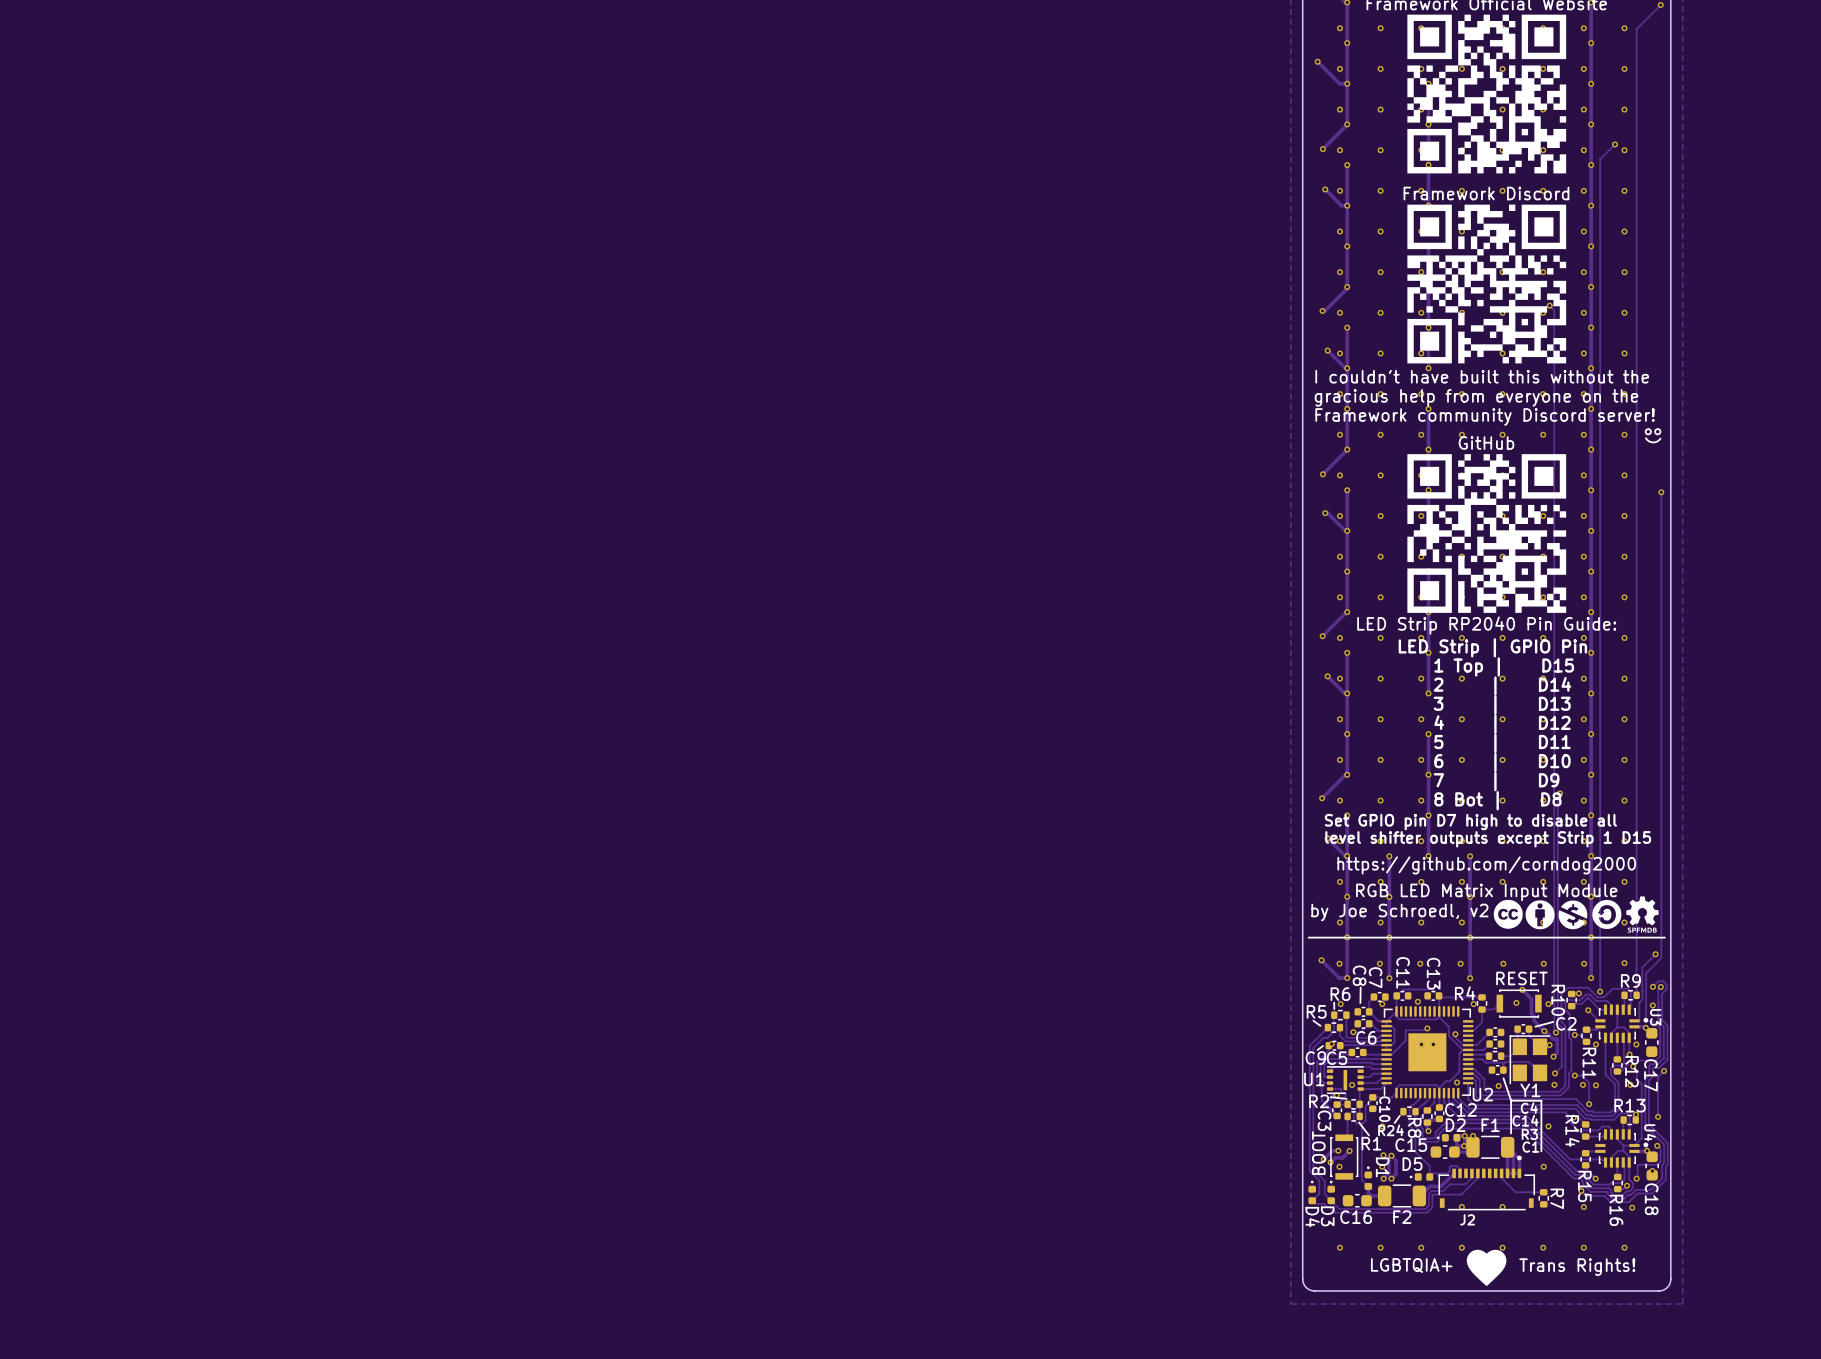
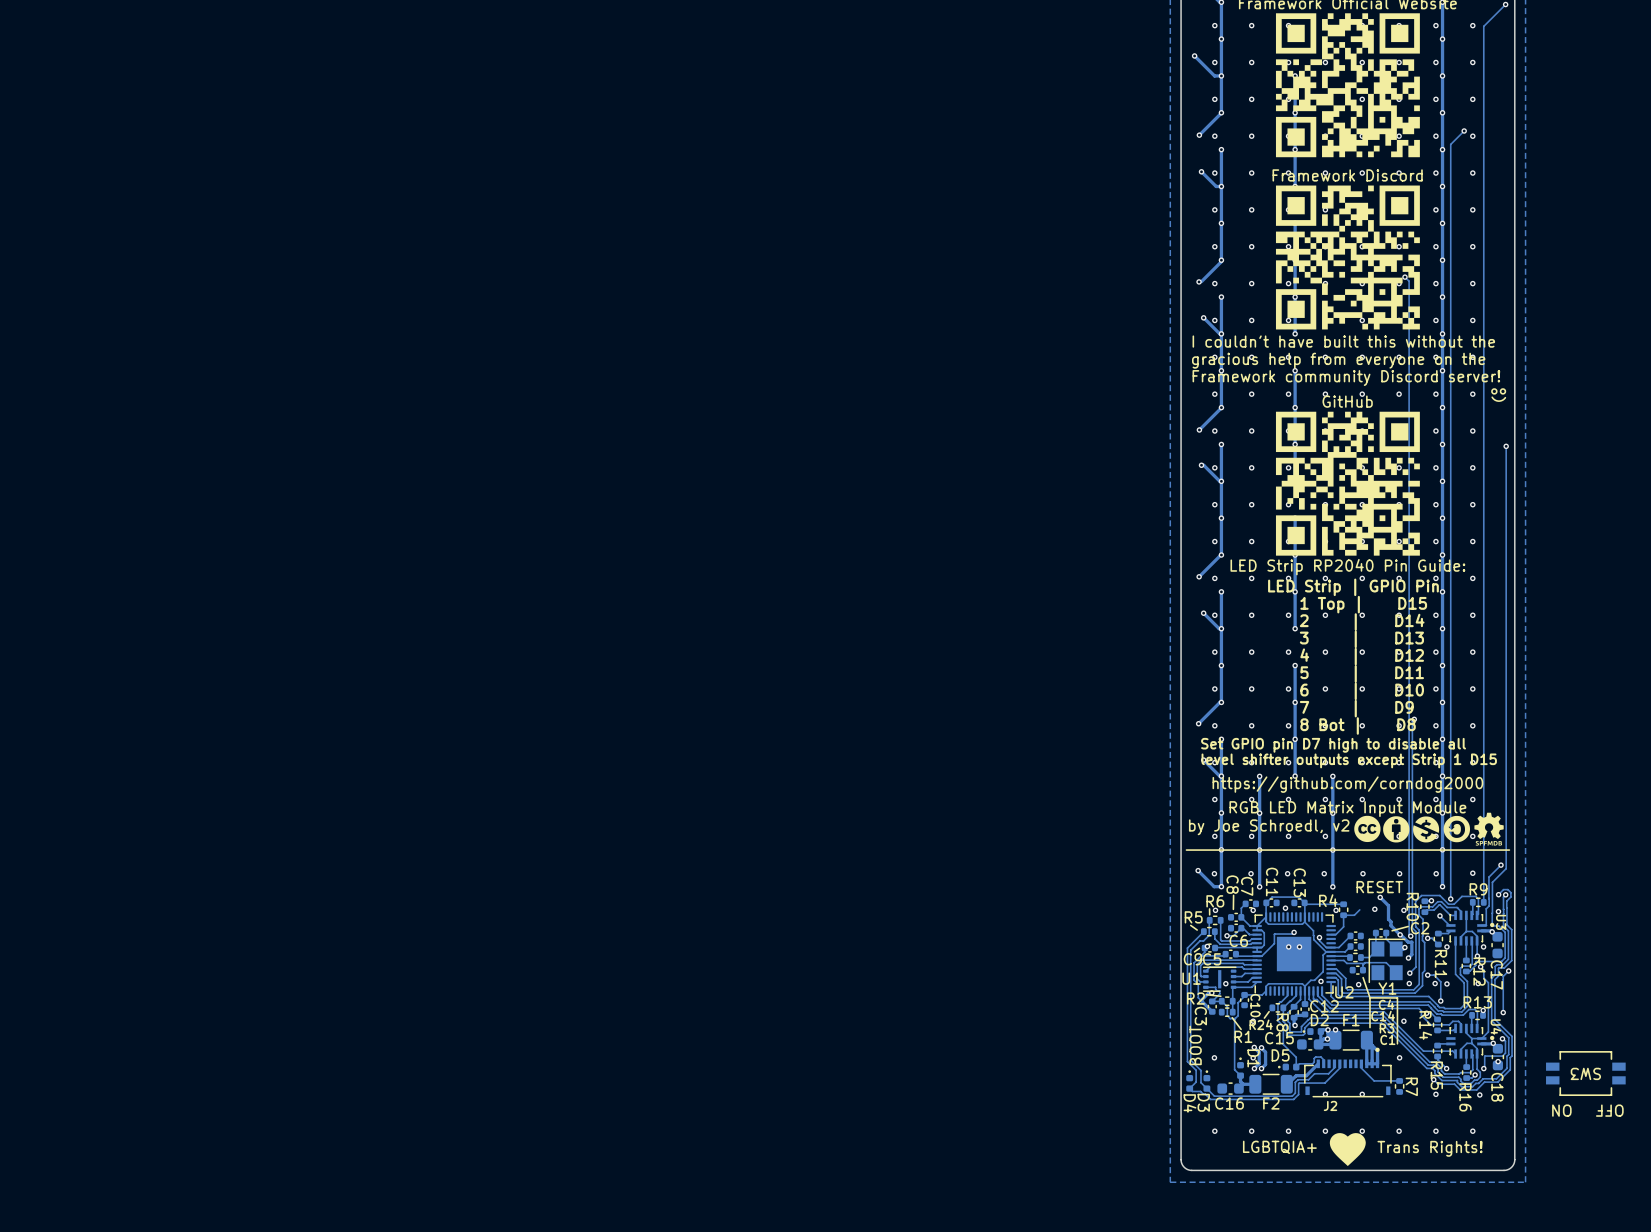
part: (1519, 1003) -> none
track: (1347, 1116) (1347, 1134) (1344, 1137) -> none
track: (1338, 1150) (1332, 1150) (1323, 1159) -> none
via: (1338, 1150) -> none
track: (1349, 1150) (1342, 1157) (1335, 1157) (1330, 1162) -> none
via: (1349, 1150) -> none
part: (1344, 1157) -> none
via: (1323, 1159) -> none
via: (1330, 1162) -> none
SW3: none -> (1585, 1073)

